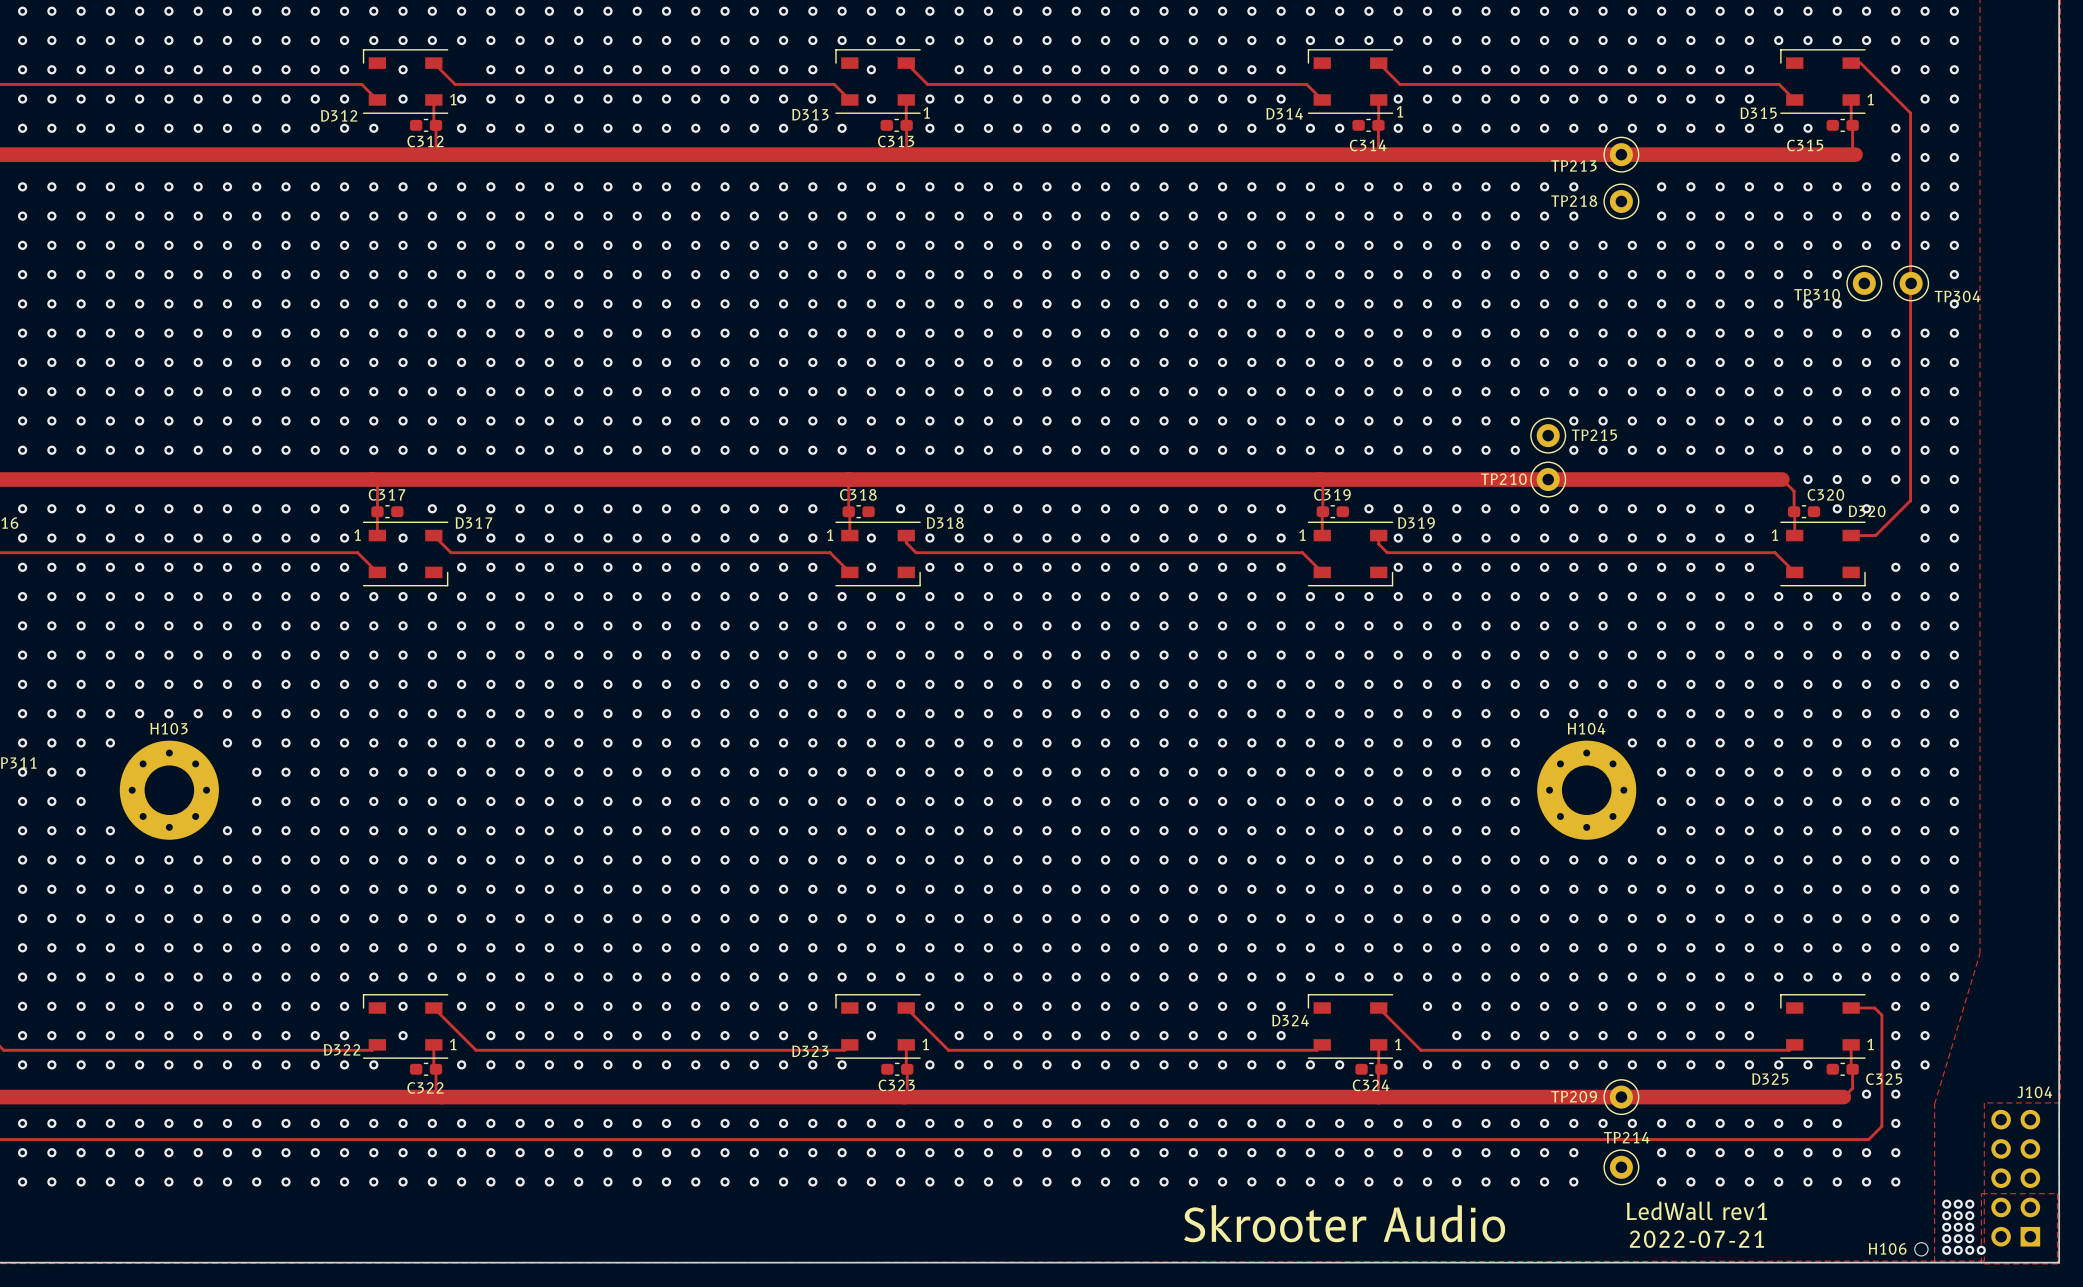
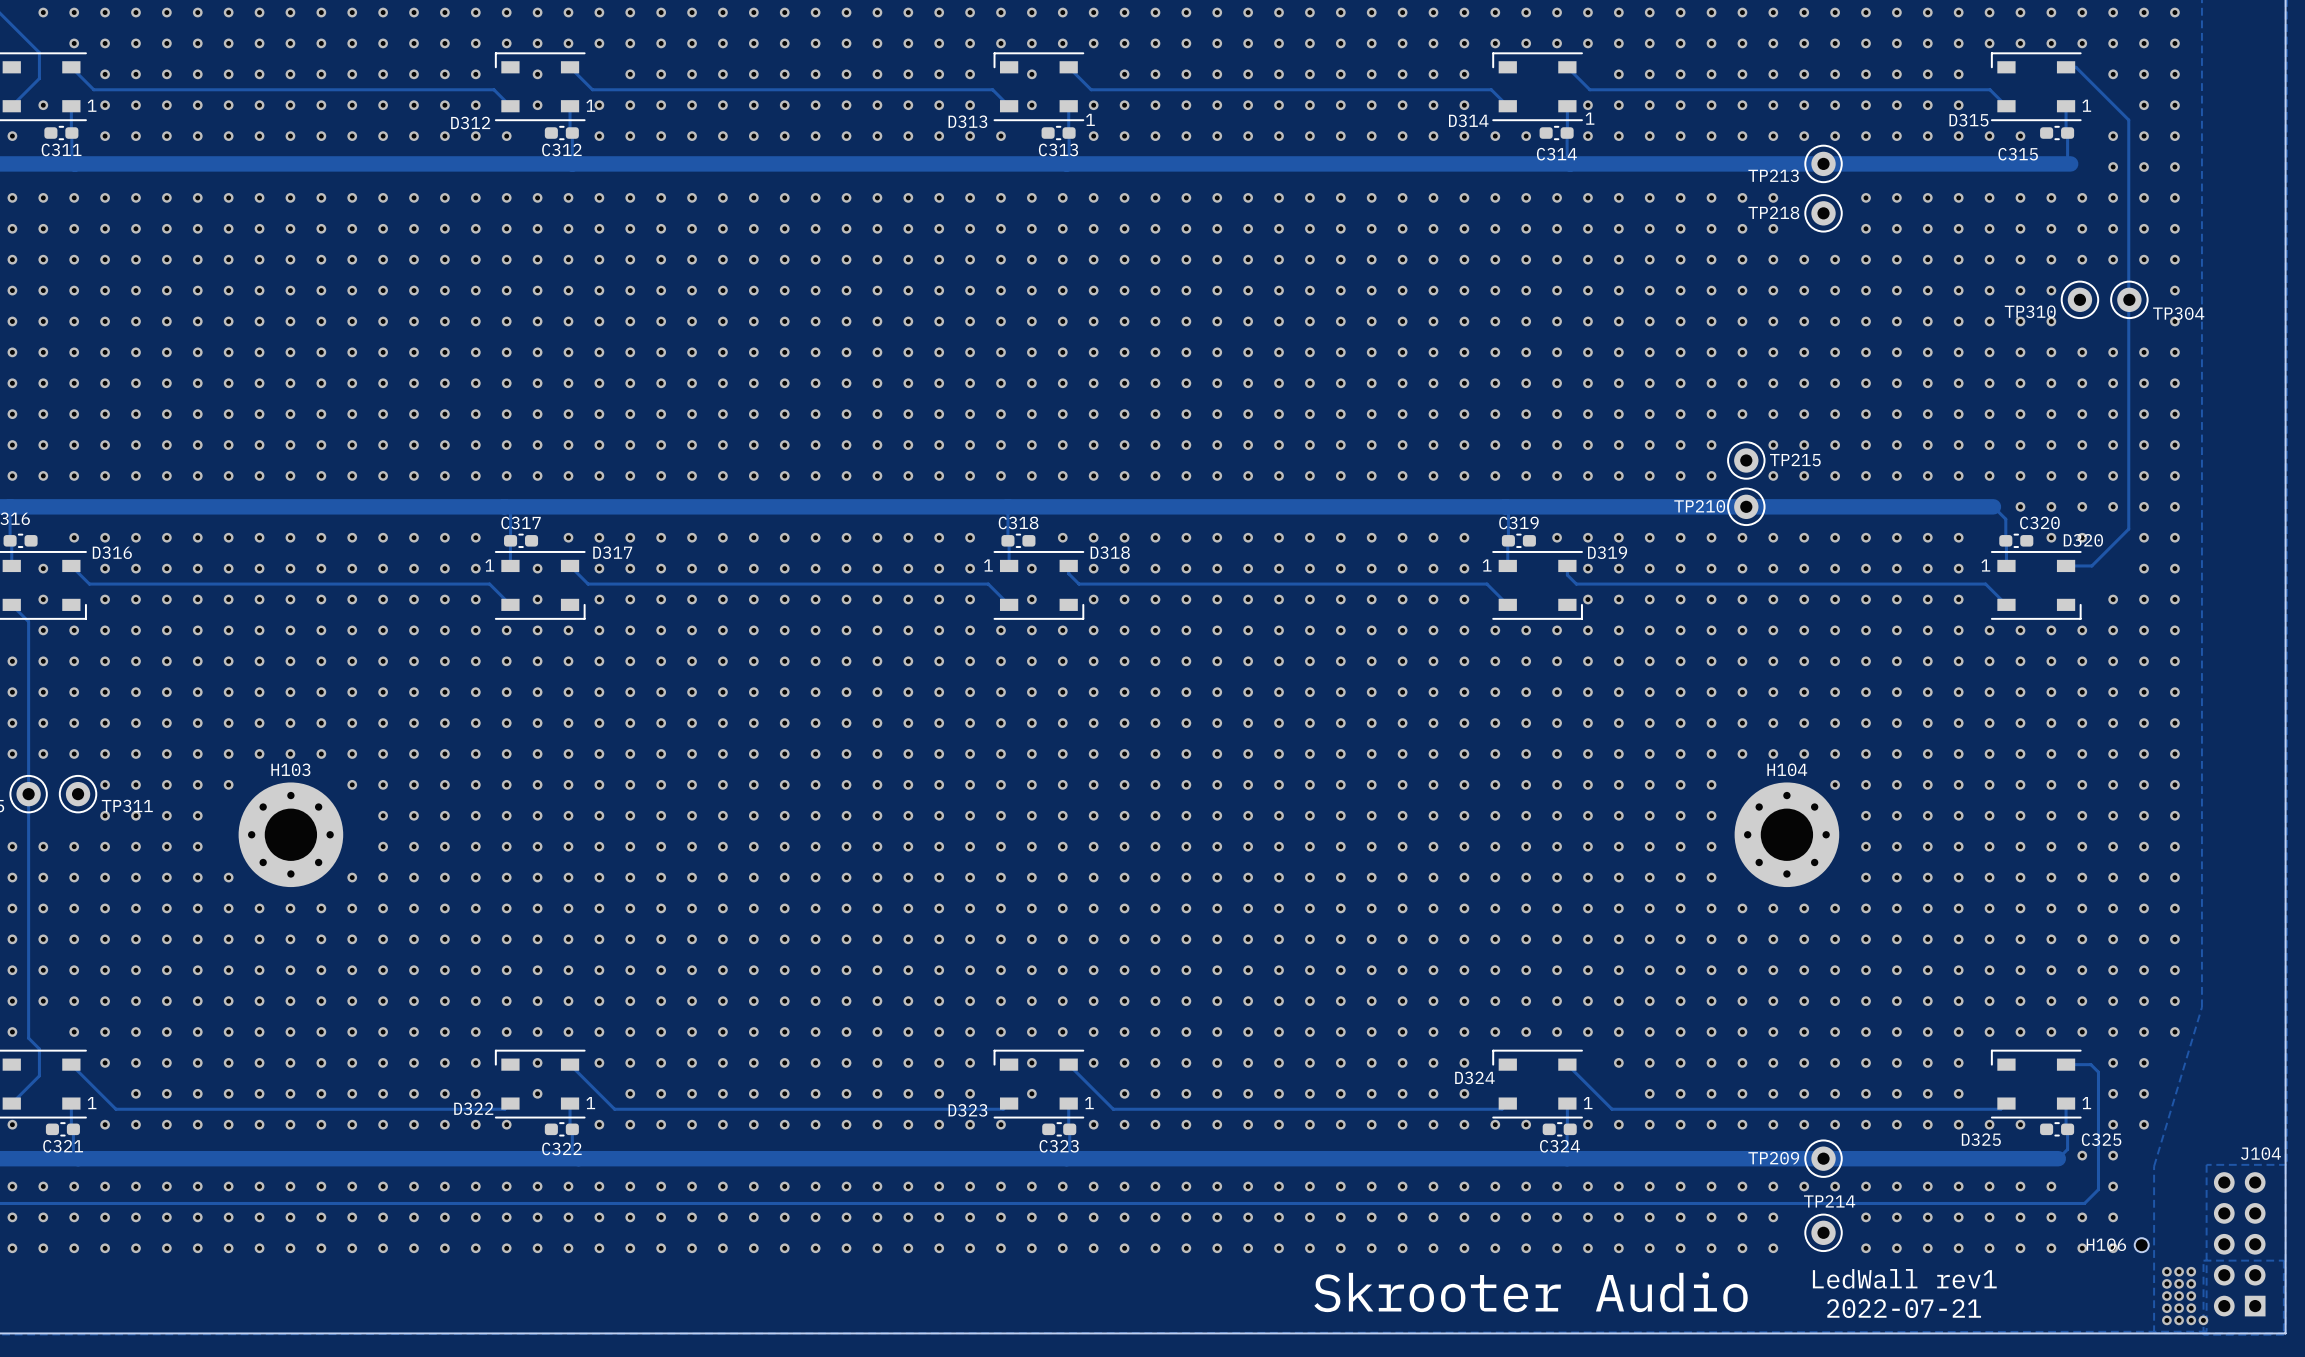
H106 position: (1921, 1249) -> (2141, 1245)

